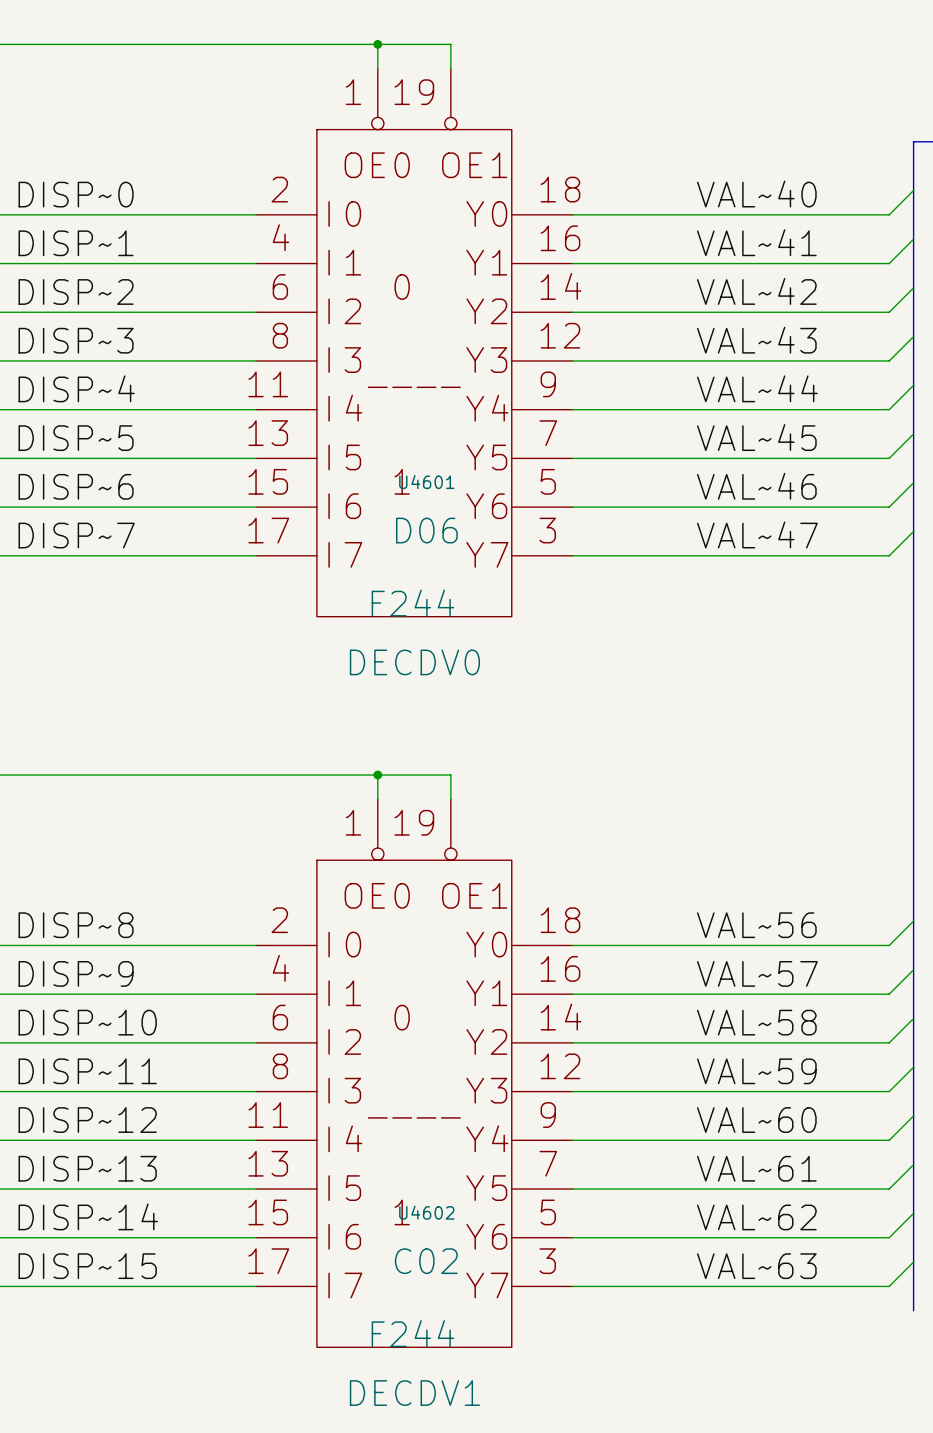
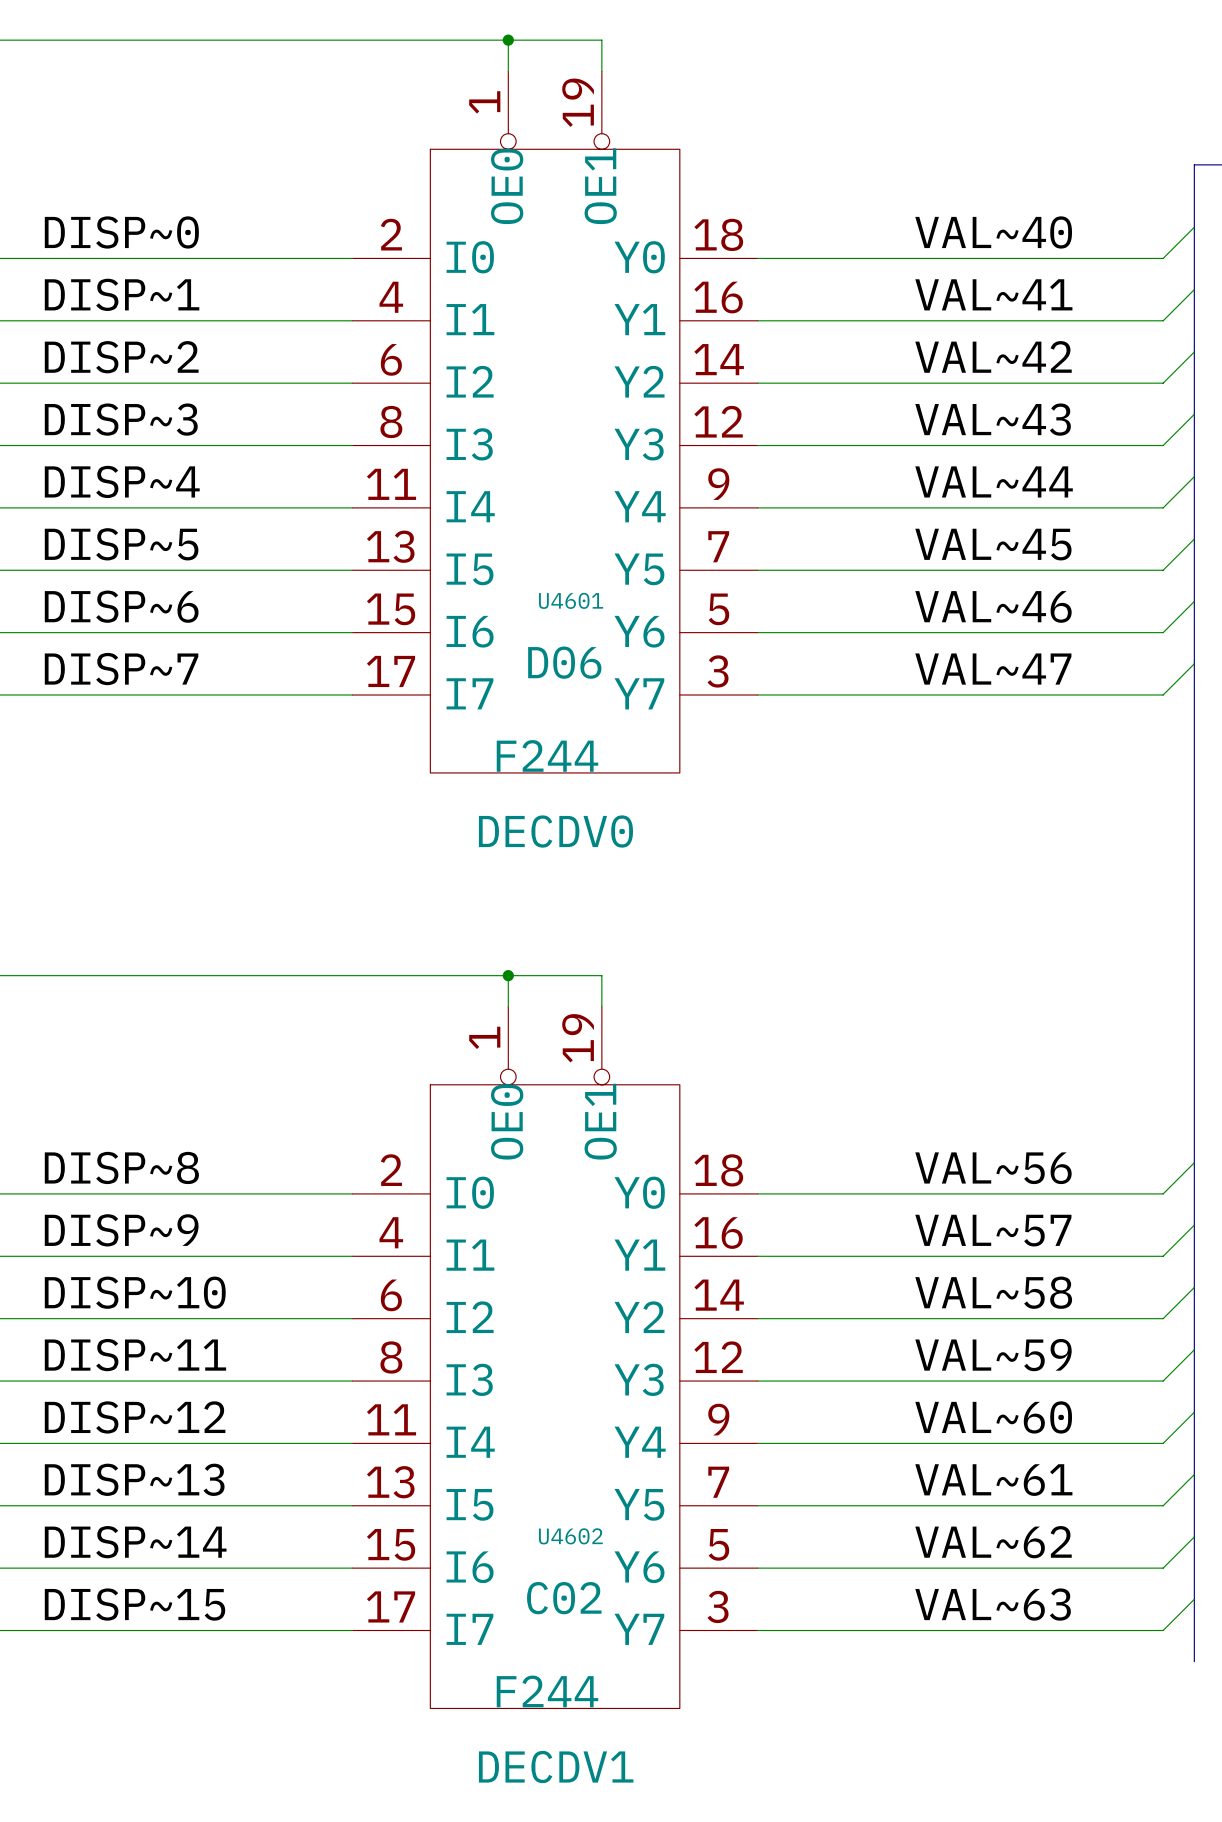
U4601 symbol: [256, 68, 573, 617] -> [352, 71, 758, 773]
U4602 symbol: [256, 799, 573, 1348] -> [352, 1006, 758, 1709]

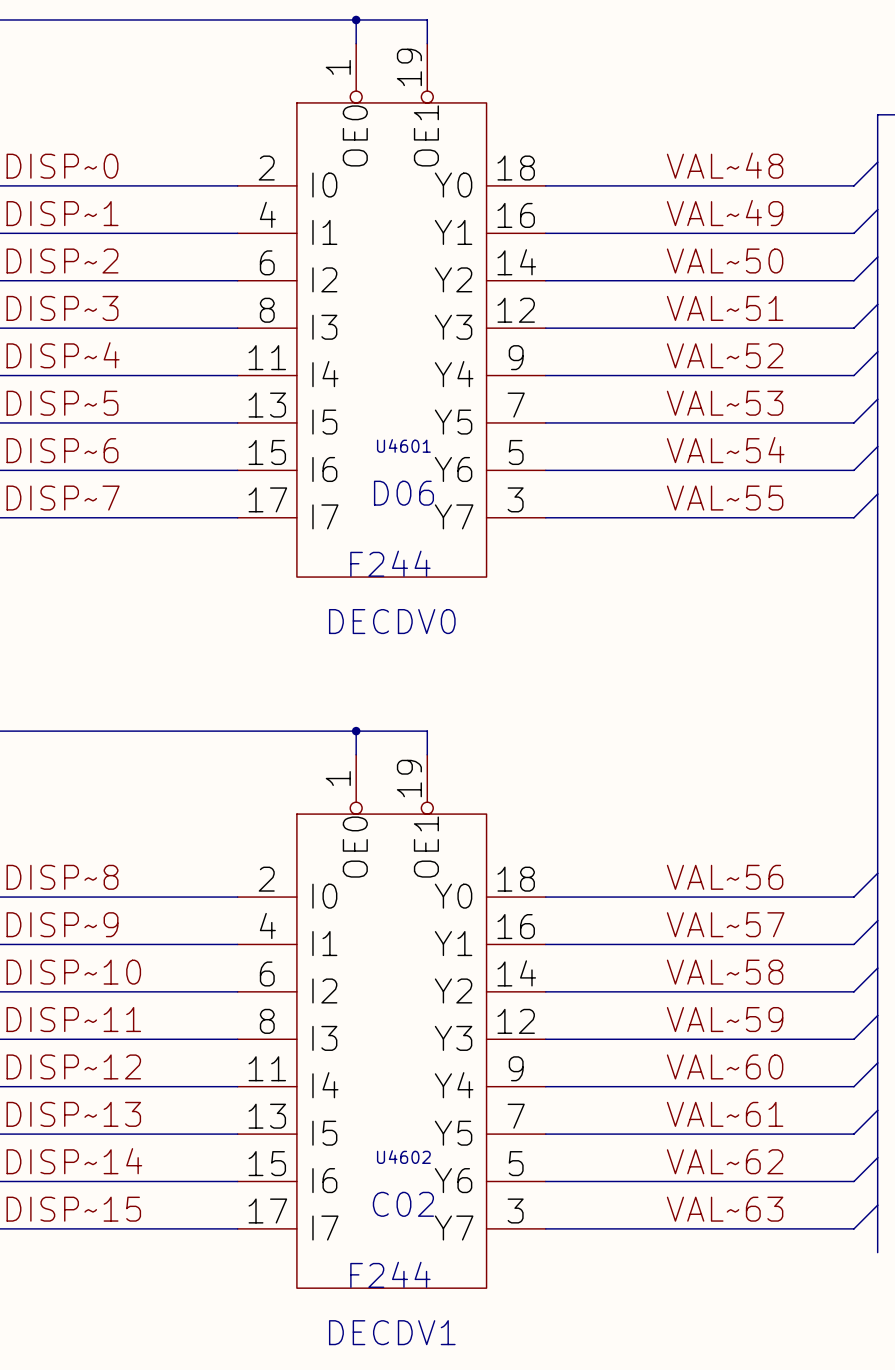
label: VAL~40 (993, 232) -> VAL~48 (725, 165)
label: VAL~41 (993, 294) -> VAL~49 (725, 213)
label: VAL~42 (993, 356) -> VAL~50 (725, 261)
label: VAL~43 (993, 419) -> VAL~51 (725, 308)
label: VAL~44 (994, 481) -> VAL~52 (725, 355)
label: VAL~45 (993, 544) -> VAL~53 (725, 403)
label: VAL~46 (993, 606) -> VAL~54 (725, 450)
label: VAL~47 (993, 669) -> VAL~55 (725, 498)

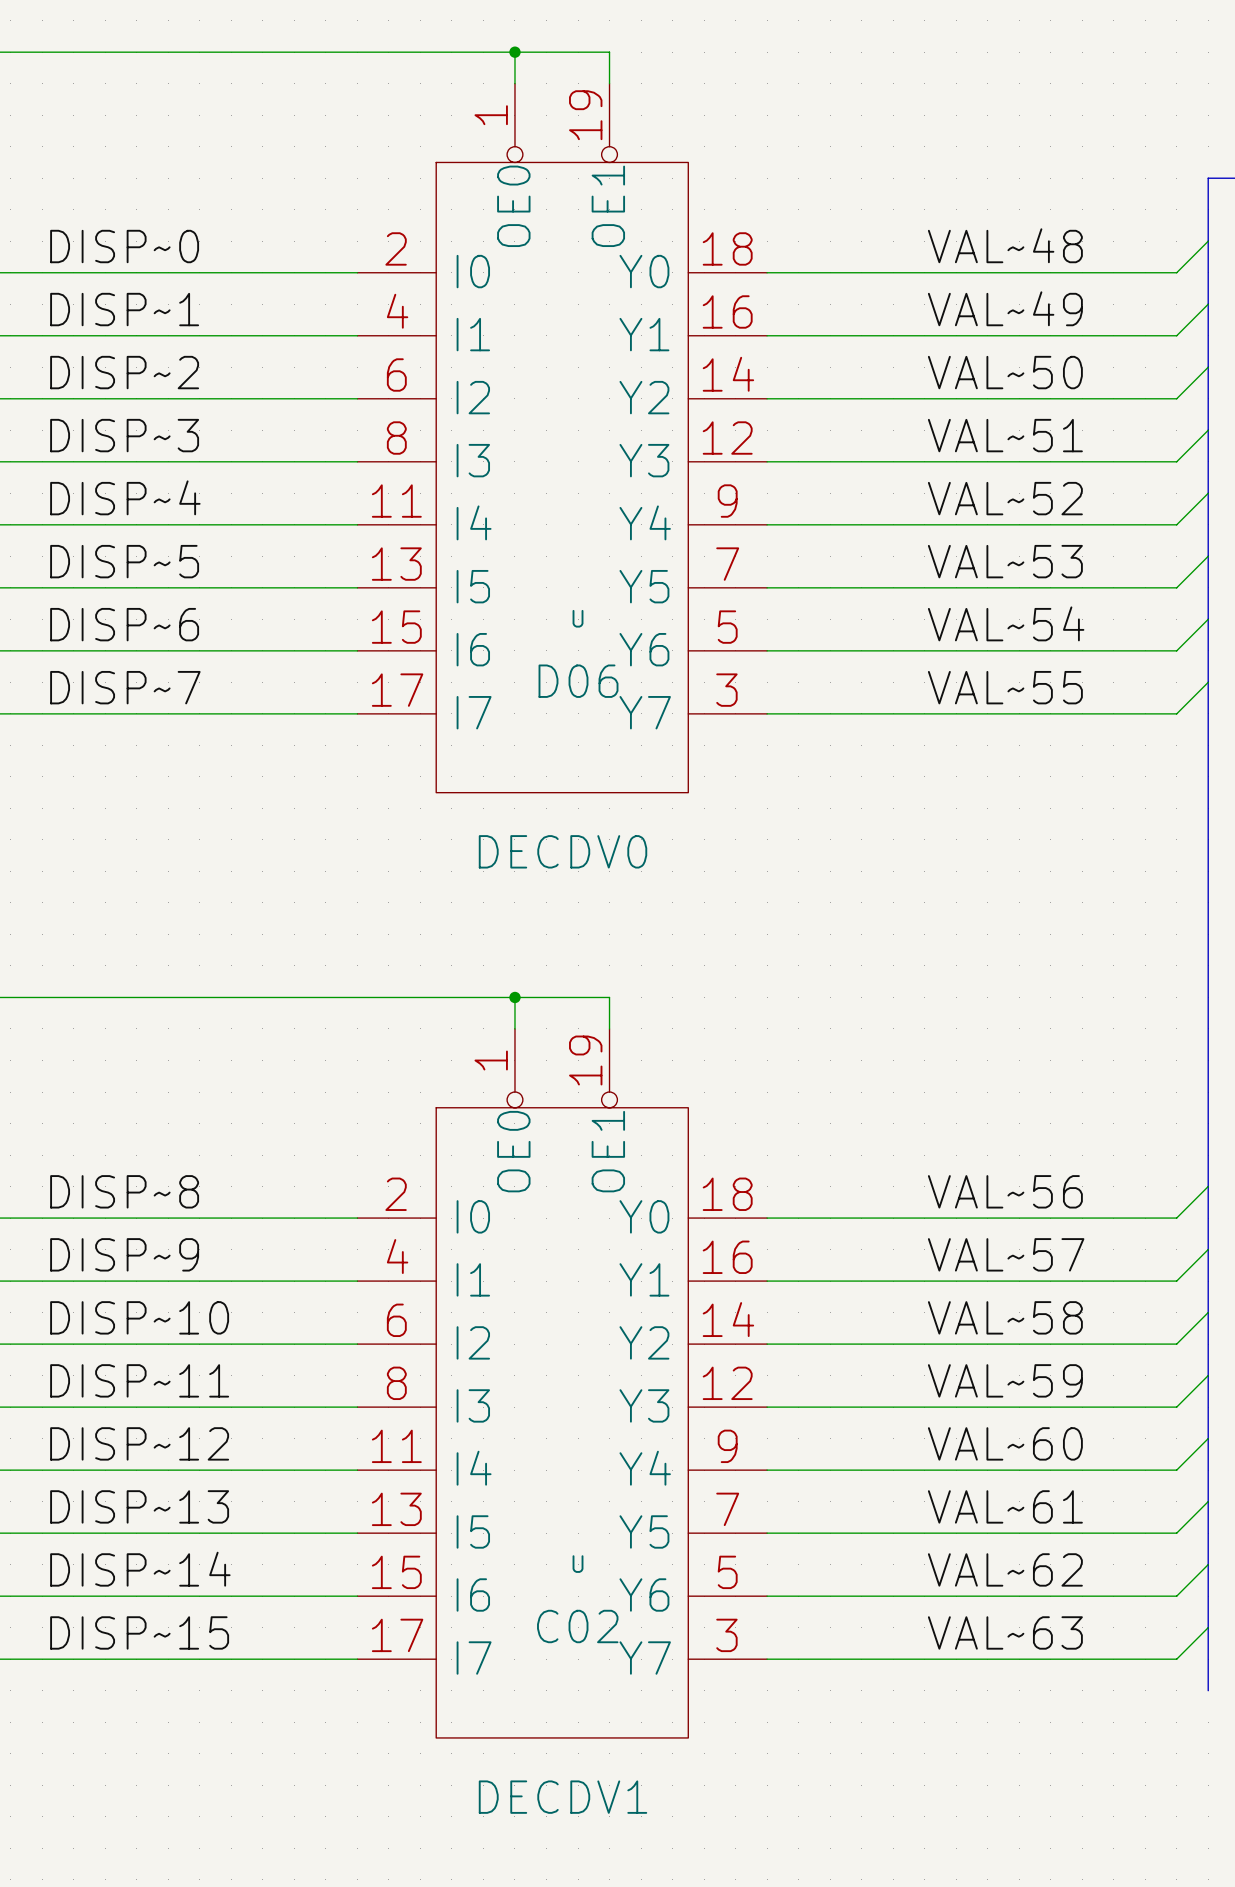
U4601 name: U4601 (403, 445) -> U (578, 618)
U4601 value: F244 (390, 563) -> none
U4602 name: U4602 (403, 1157) -> U (578, 1564)
U4602 value: F244 (390, 1274) -> none

